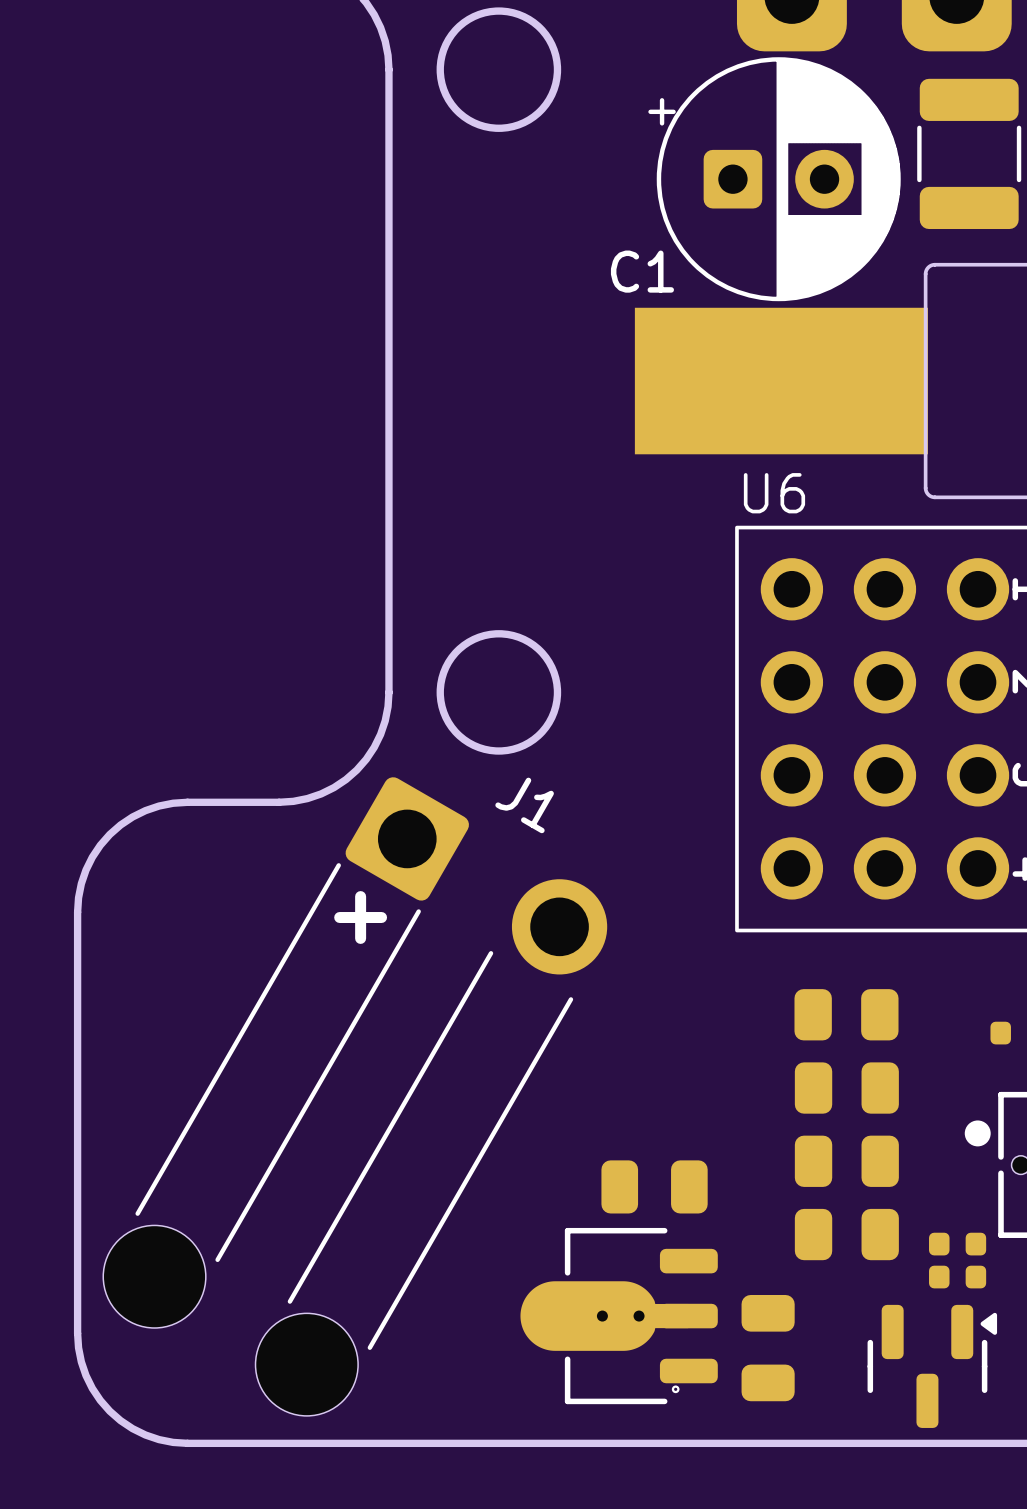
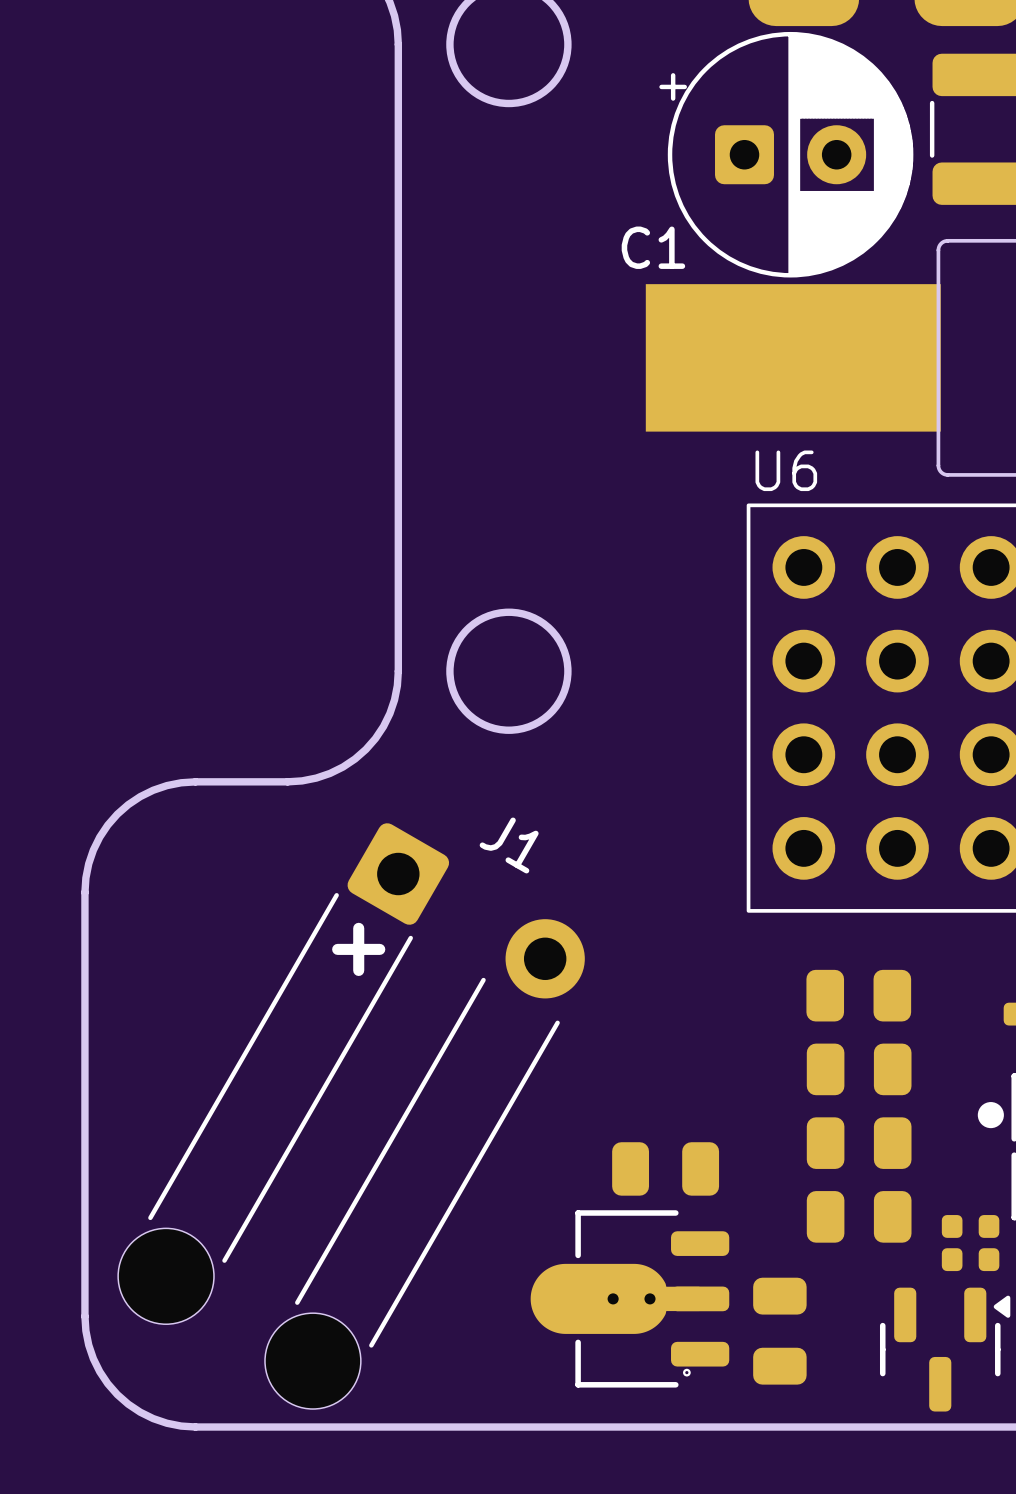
J1 footprint: [103, 777, 608, 1416] -> [118, 823, 585, 1410]
text position: + (360, 917) -> + (358, 949)

